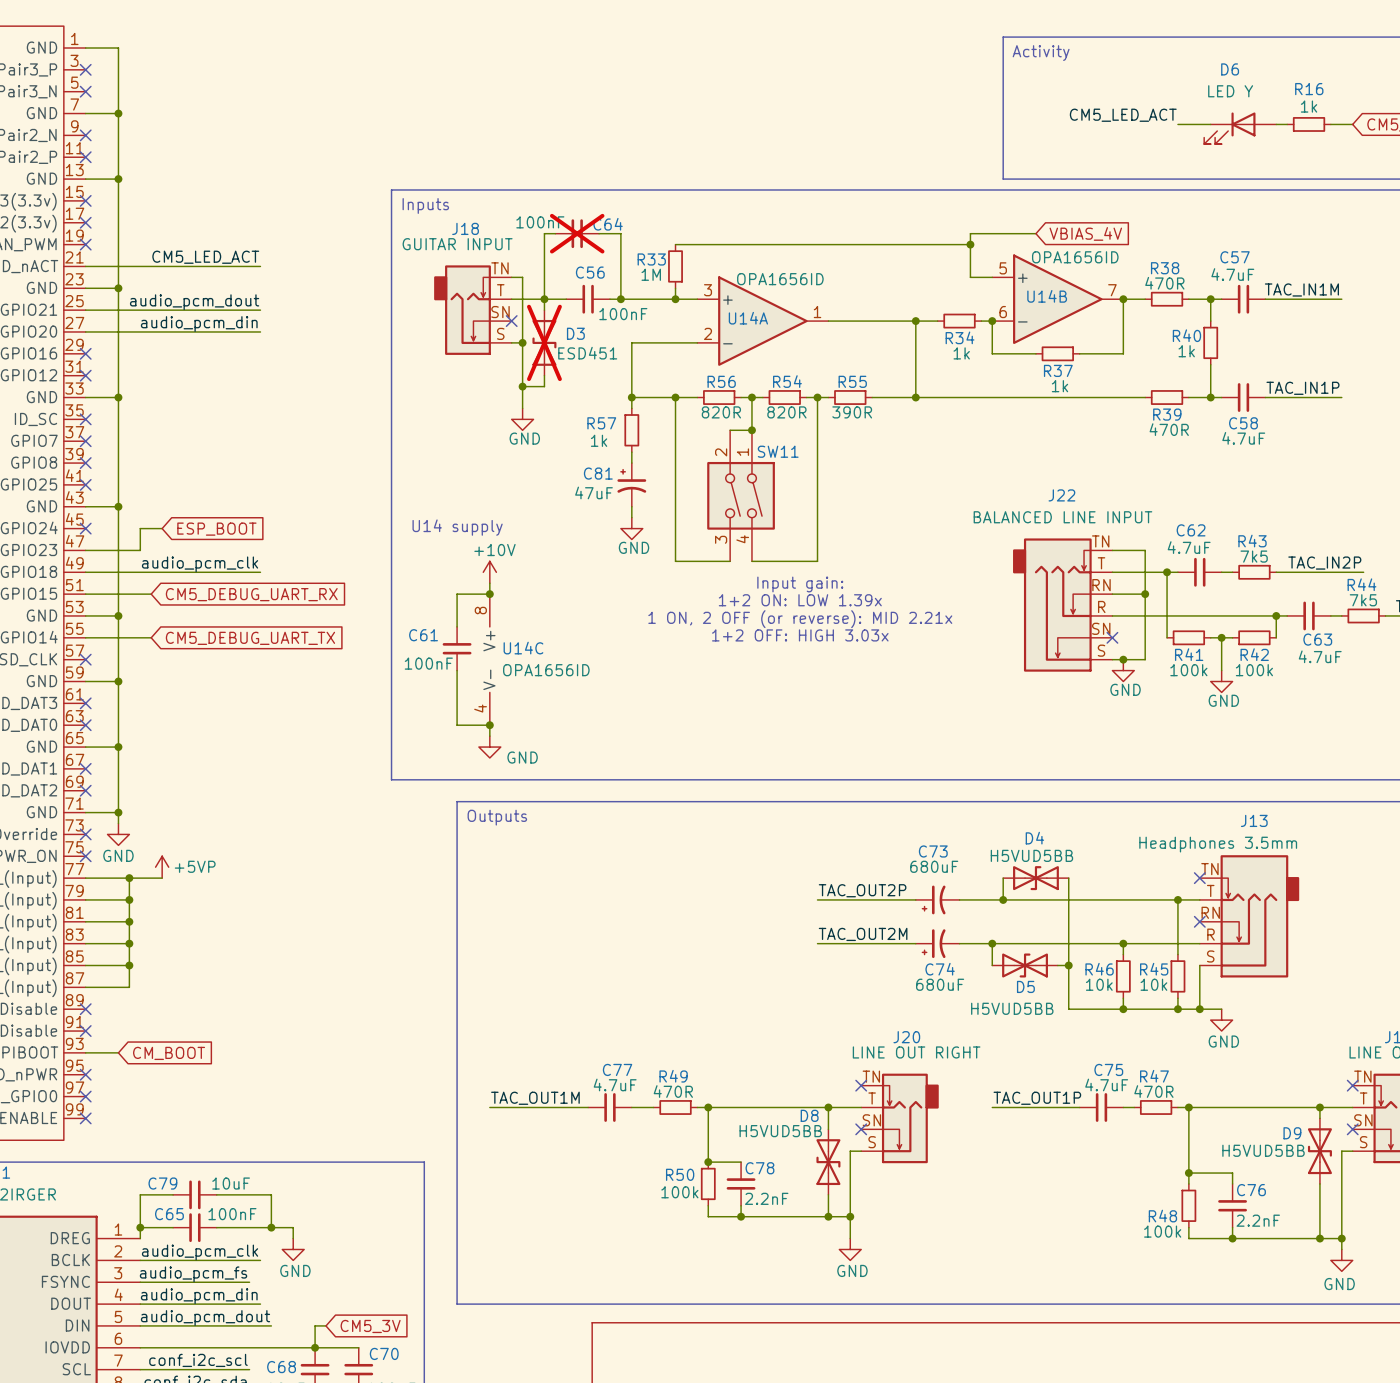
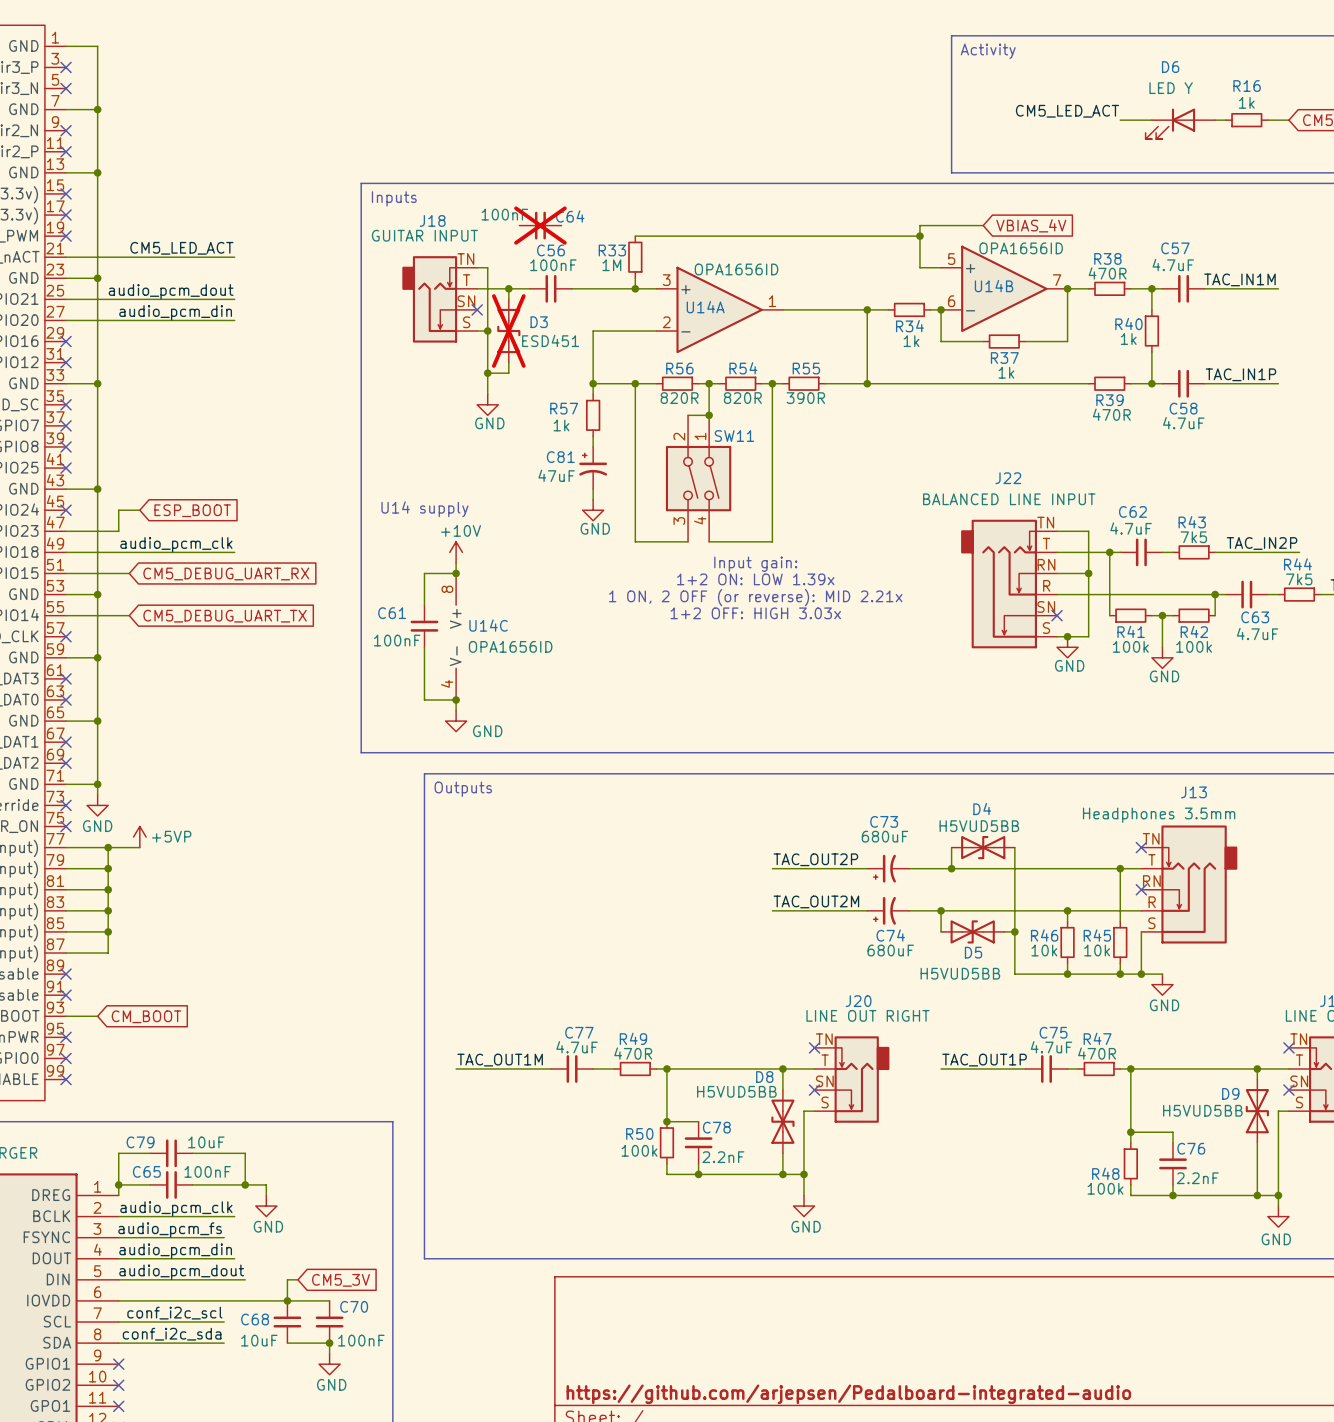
wire: (555, 233) (544, 233) (544, 299) -> none
wire: (599, 233) (620, 233) (620, 299) -> none
C56 name position: C56 (590, 272) -> C56 (550, 250)
junction: (620, 299) -> none
C56 value position: 100nF (623, 314) -> 100nF (553, 265)

